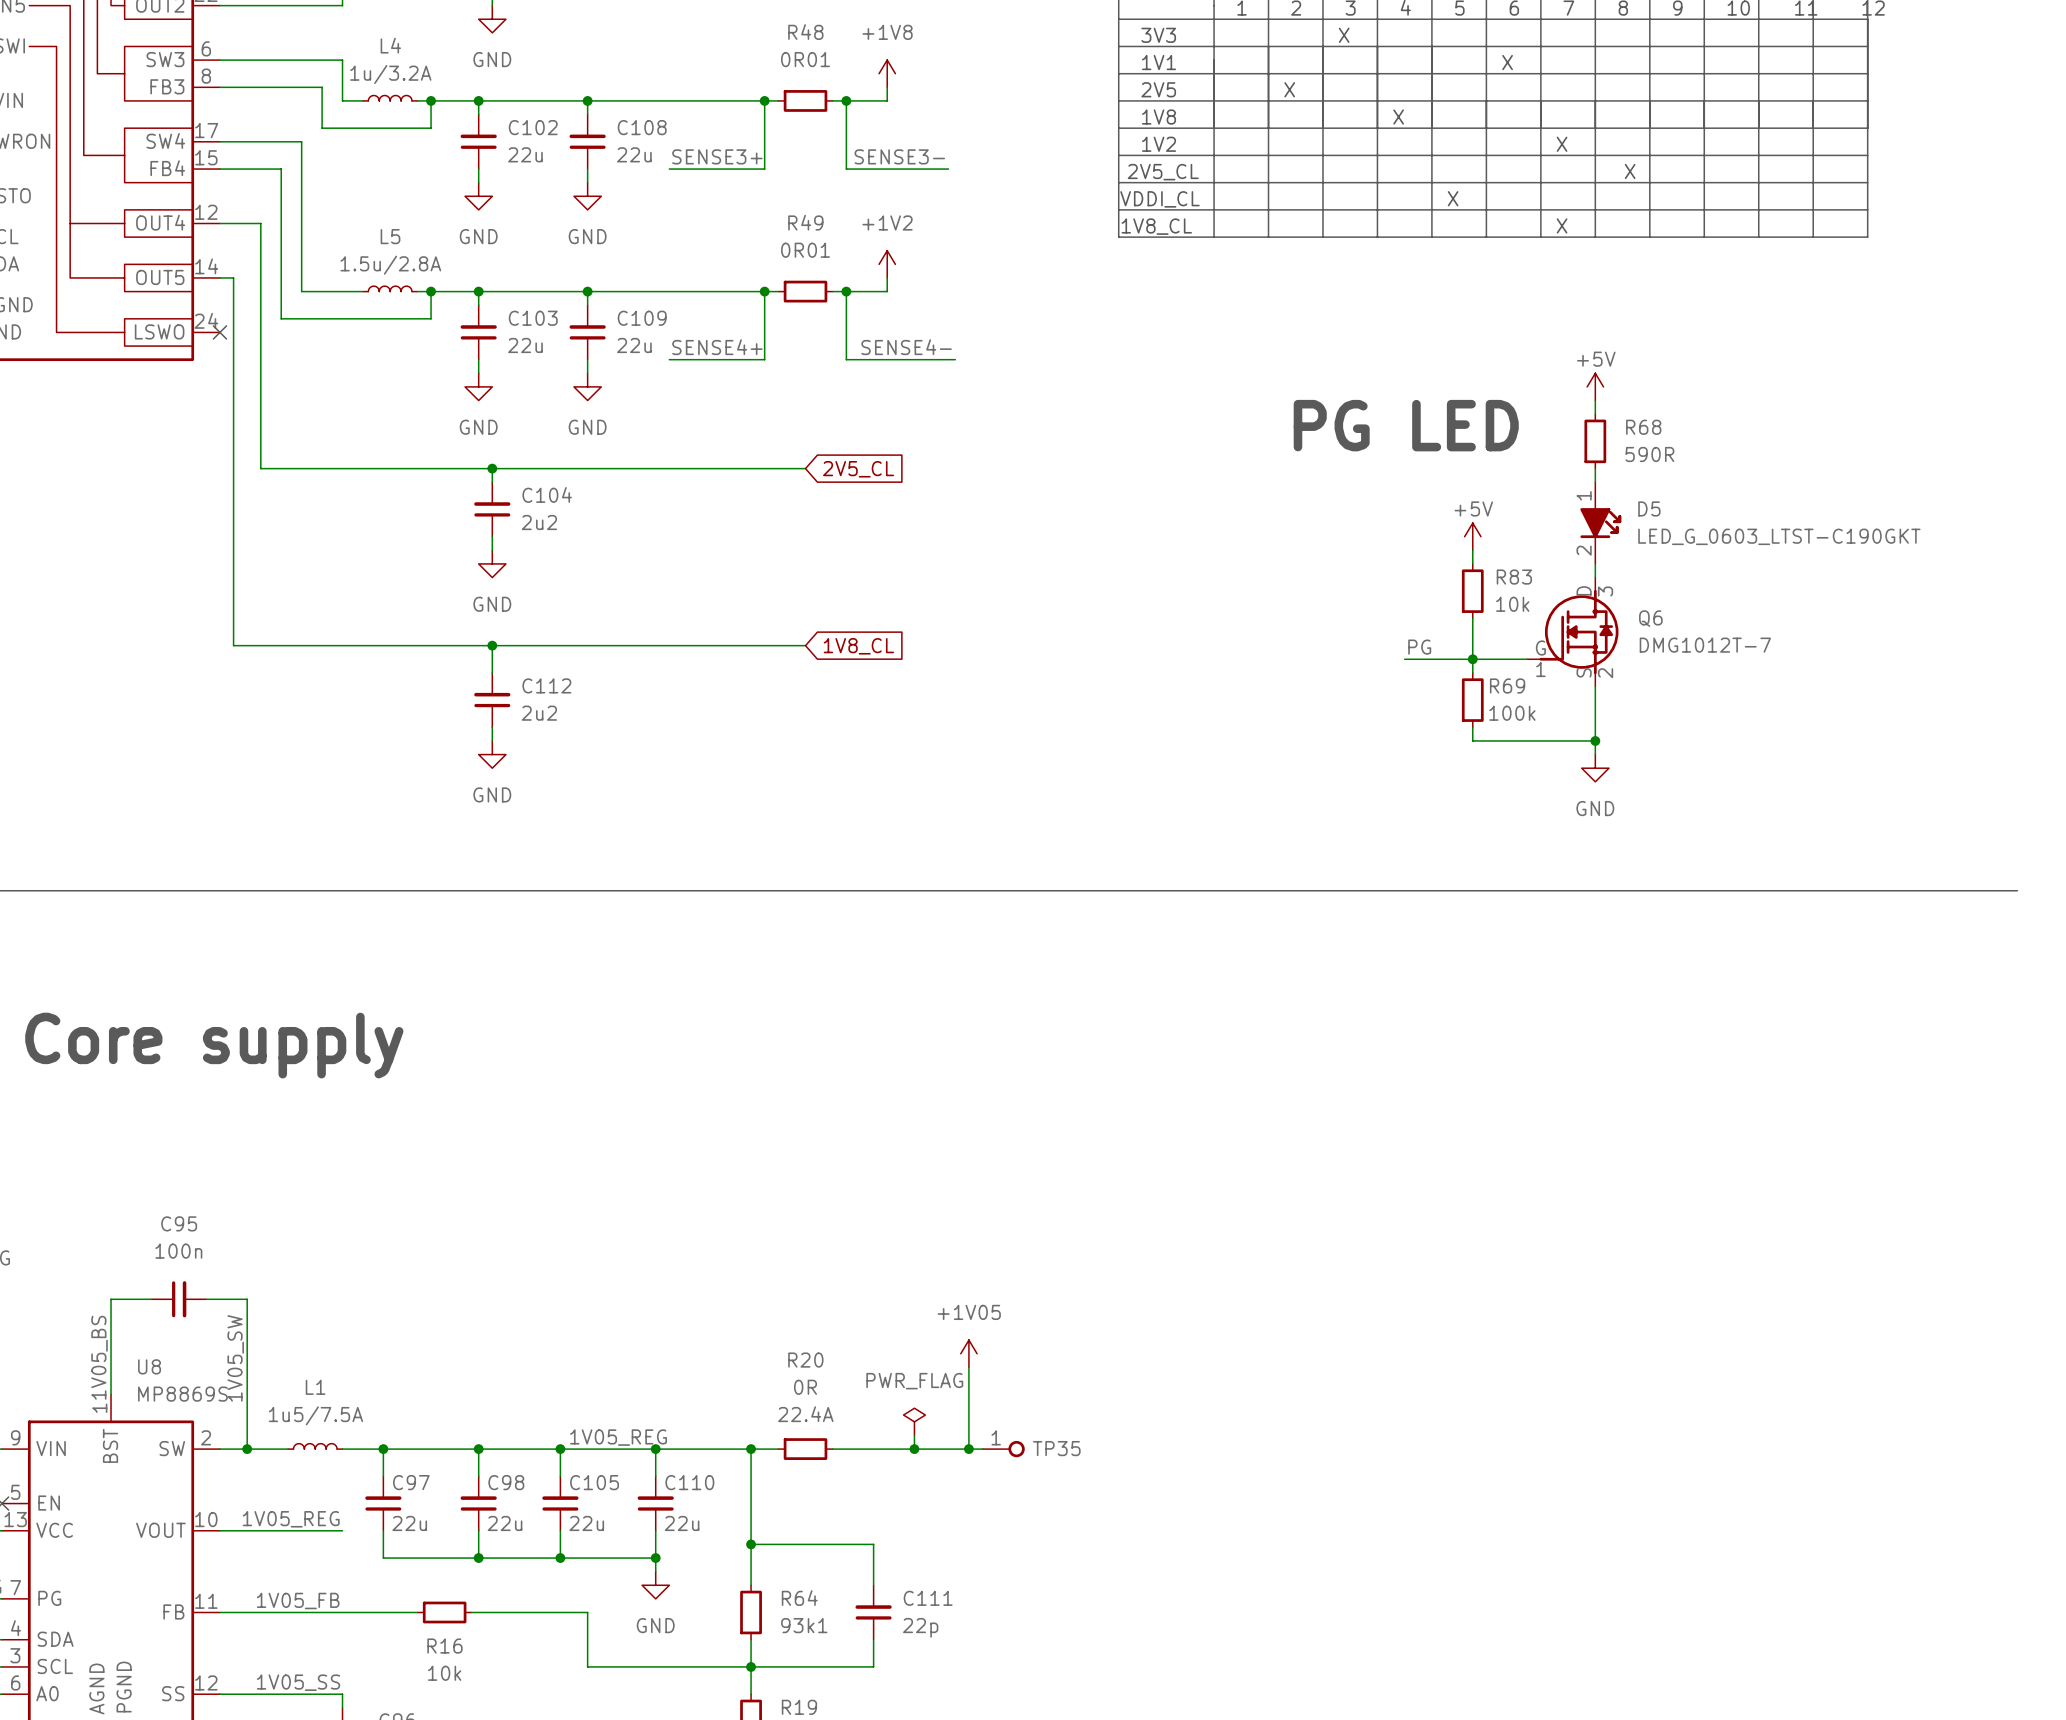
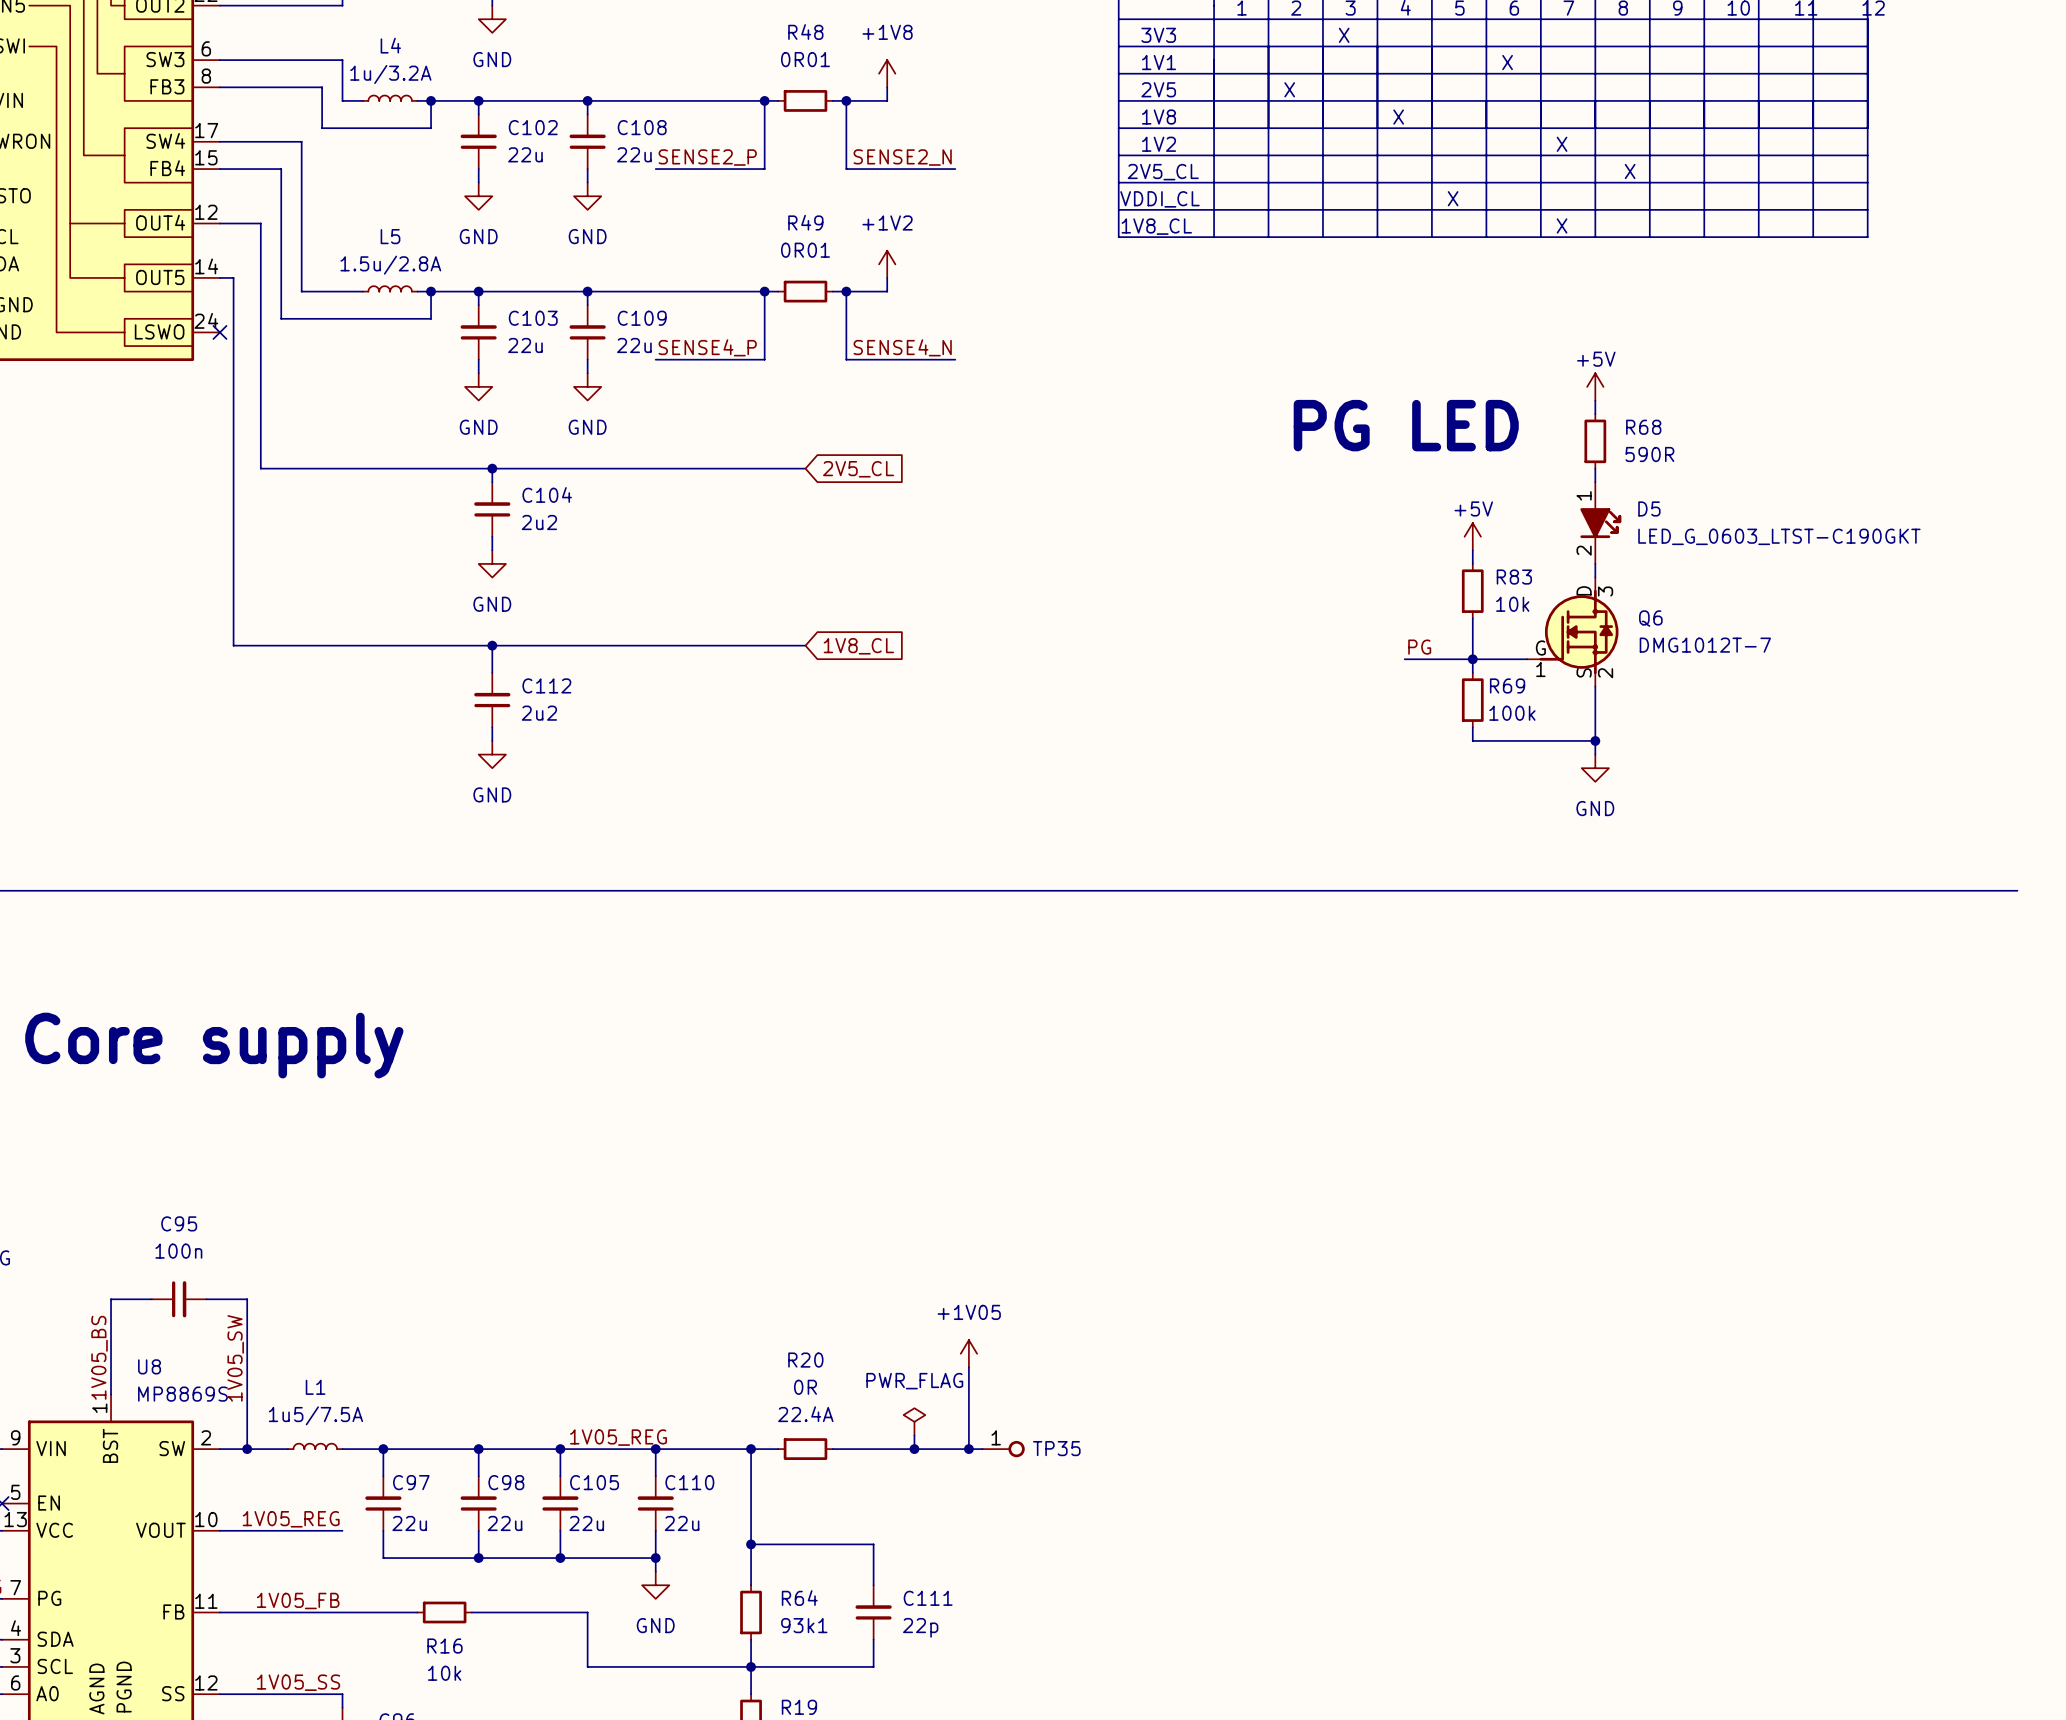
label: SENSE3+ (717, 156) -> SENSE2_P (707, 157)
label: SENSE3- (899, 156) -> SENSE2_N (902, 157)
wire: none -> (655, 169) (669, 169)
wire: none -> (948, 169) (955, 169)
label: SENSE4+ (717, 347) -> SENSE4_P (707, 347)
label: SENSE4- (906, 347) -> SENSE4_N (902, 347)
wire: none -> (655, 359) (669, 359)

